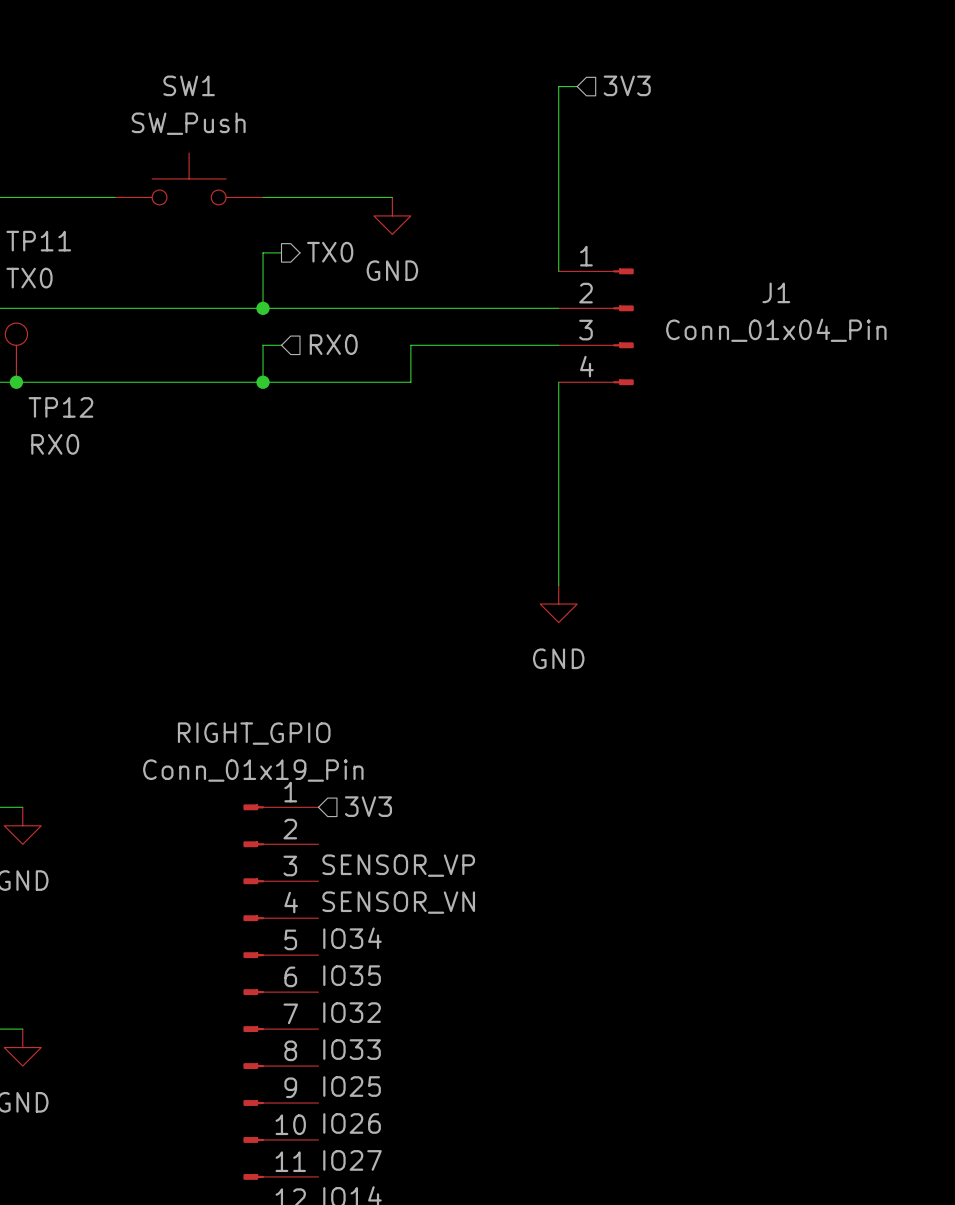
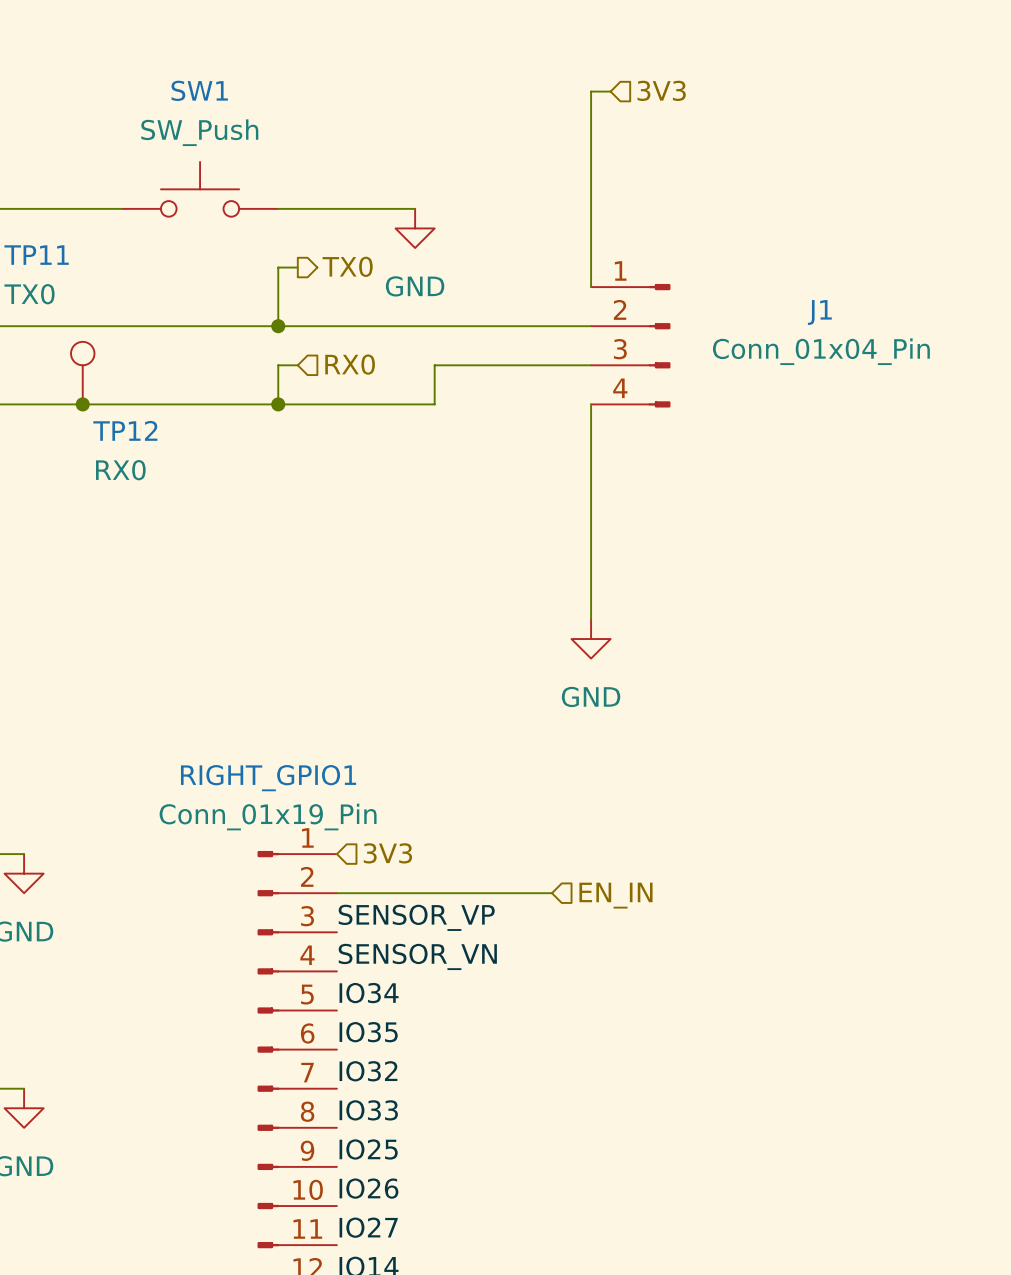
TP12 position: (16, 352) -> (82, 373)
junction position: (16, 382) -> (82, 404)
RIGHT_GPIO name: RIGHT_GPIO (254, 733) -> RIGHT_GPIO1 (268, 778)
wire: none -> (336, 893) (551, 893)
hierarchical label: none -> EN_IN (616, 895)

